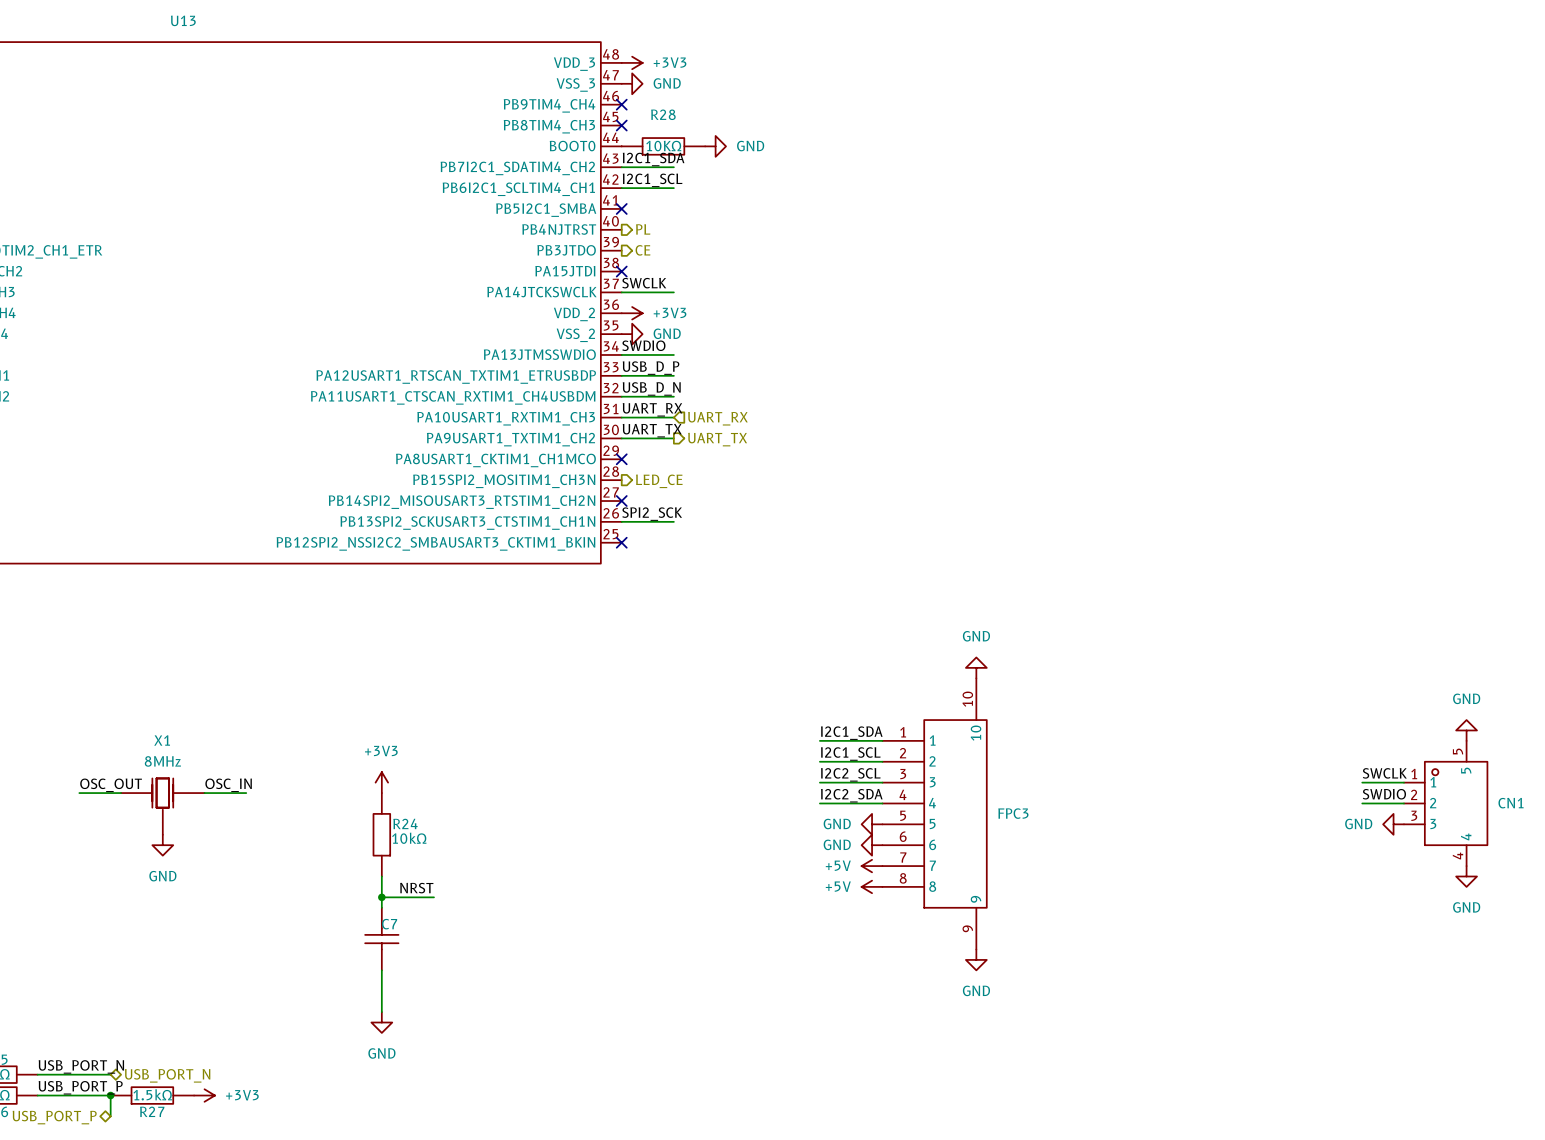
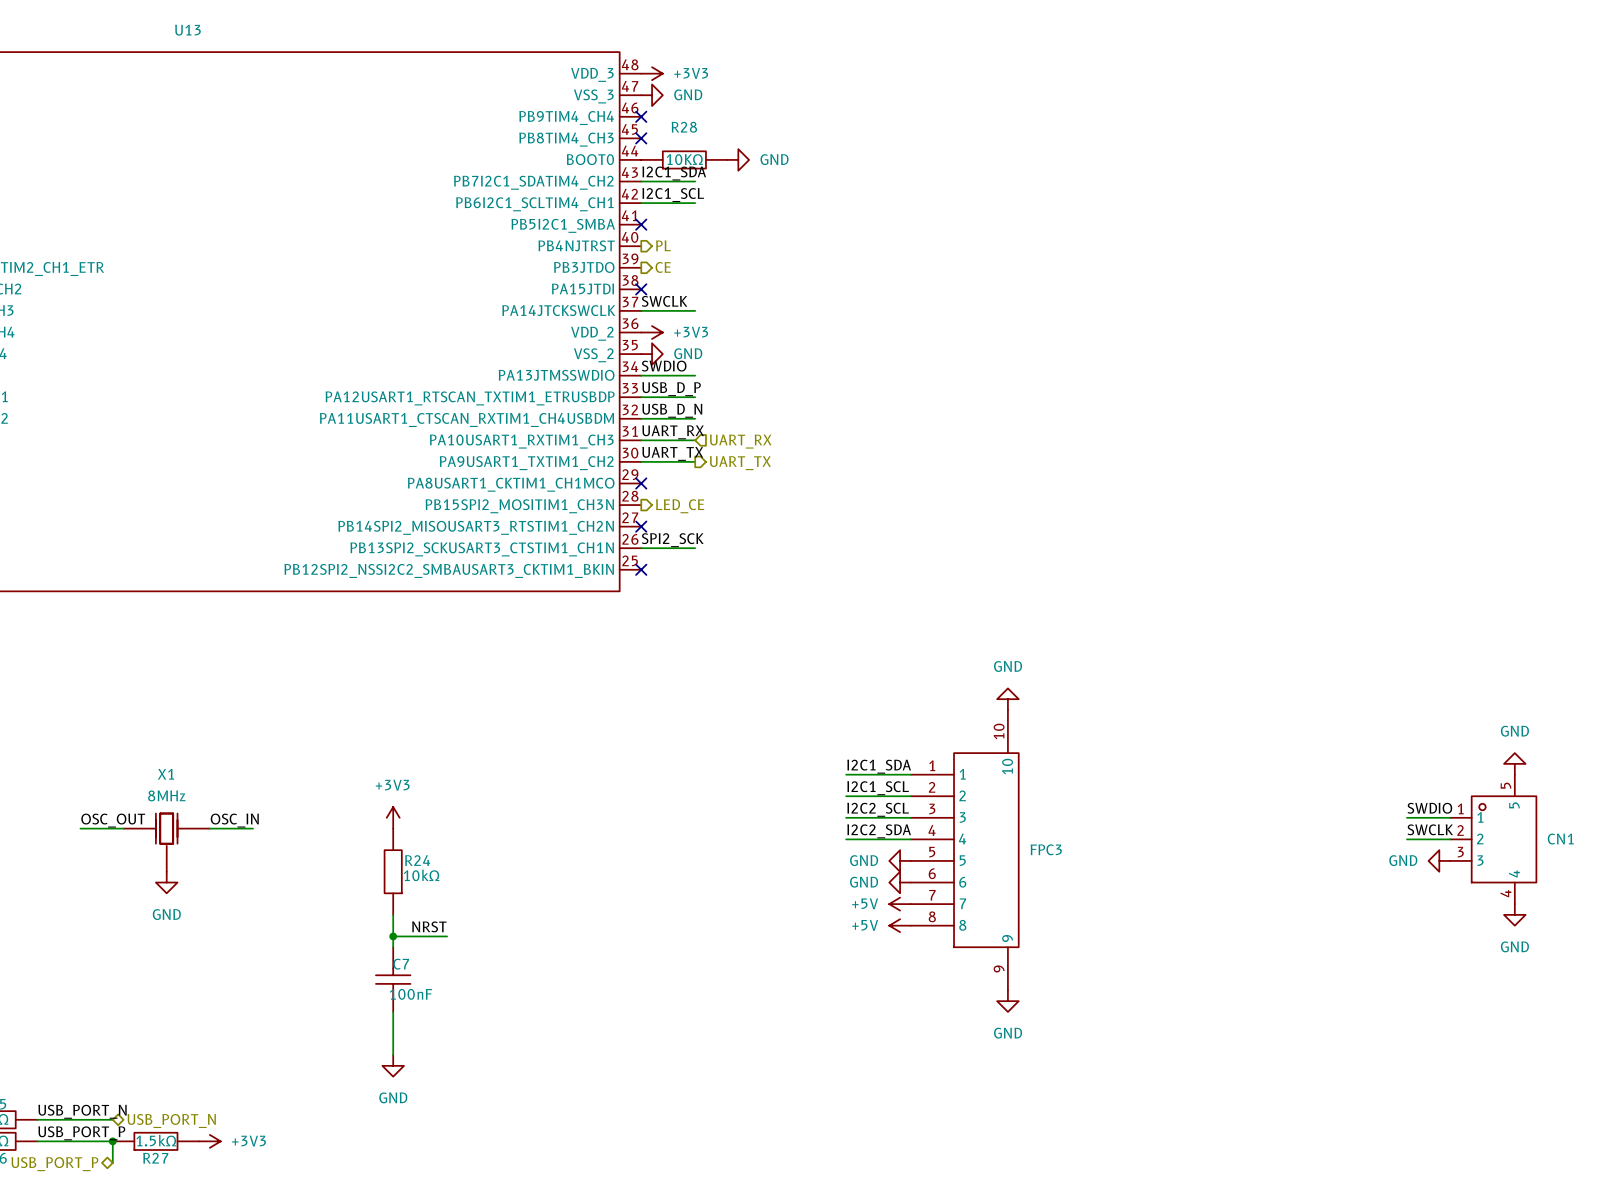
label: SWCLK (1384, 773) -> SWDIO (1429, 808)
label: SWDIO (1384, 794) -> SWCLK (1430, 829)
C7 value: none -> 100nF (410, 994)

